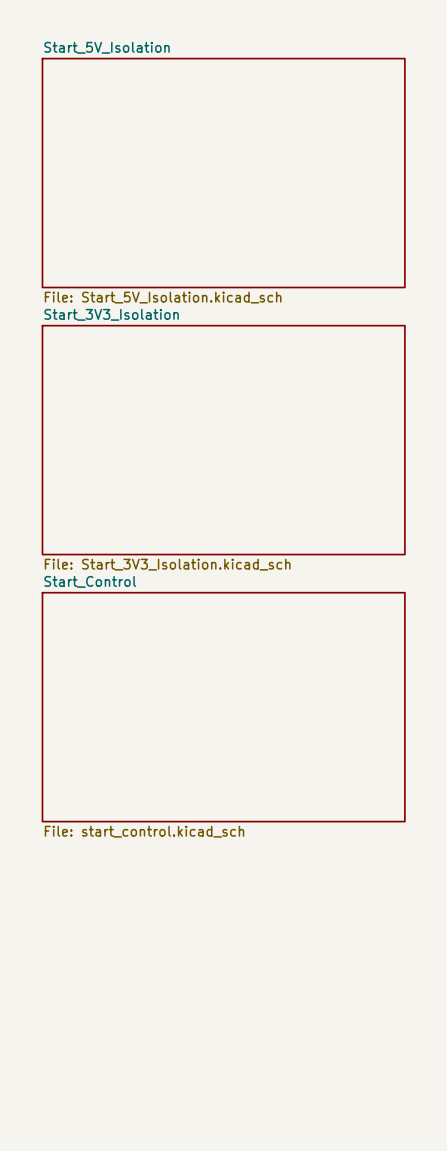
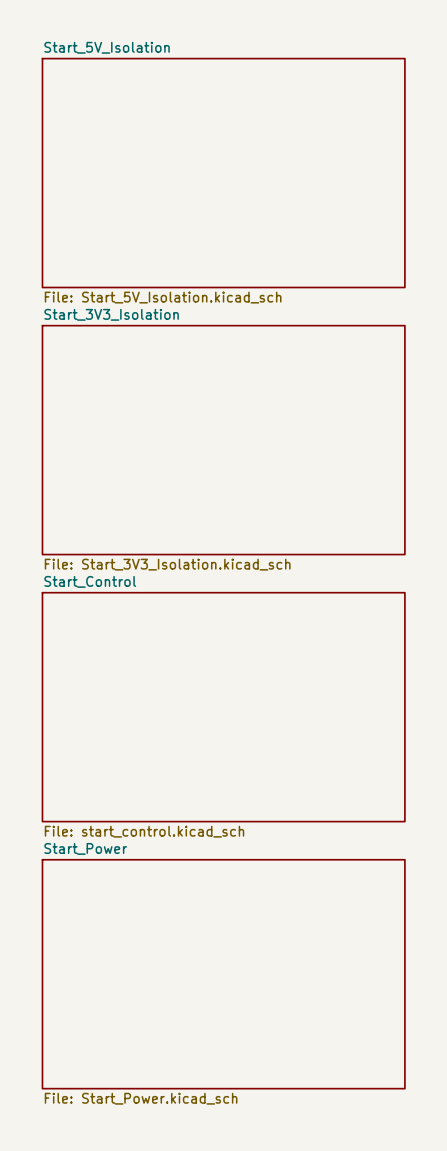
sheet Start_Power: none -> File: Start_Power.kicad_sch (223, 974)

